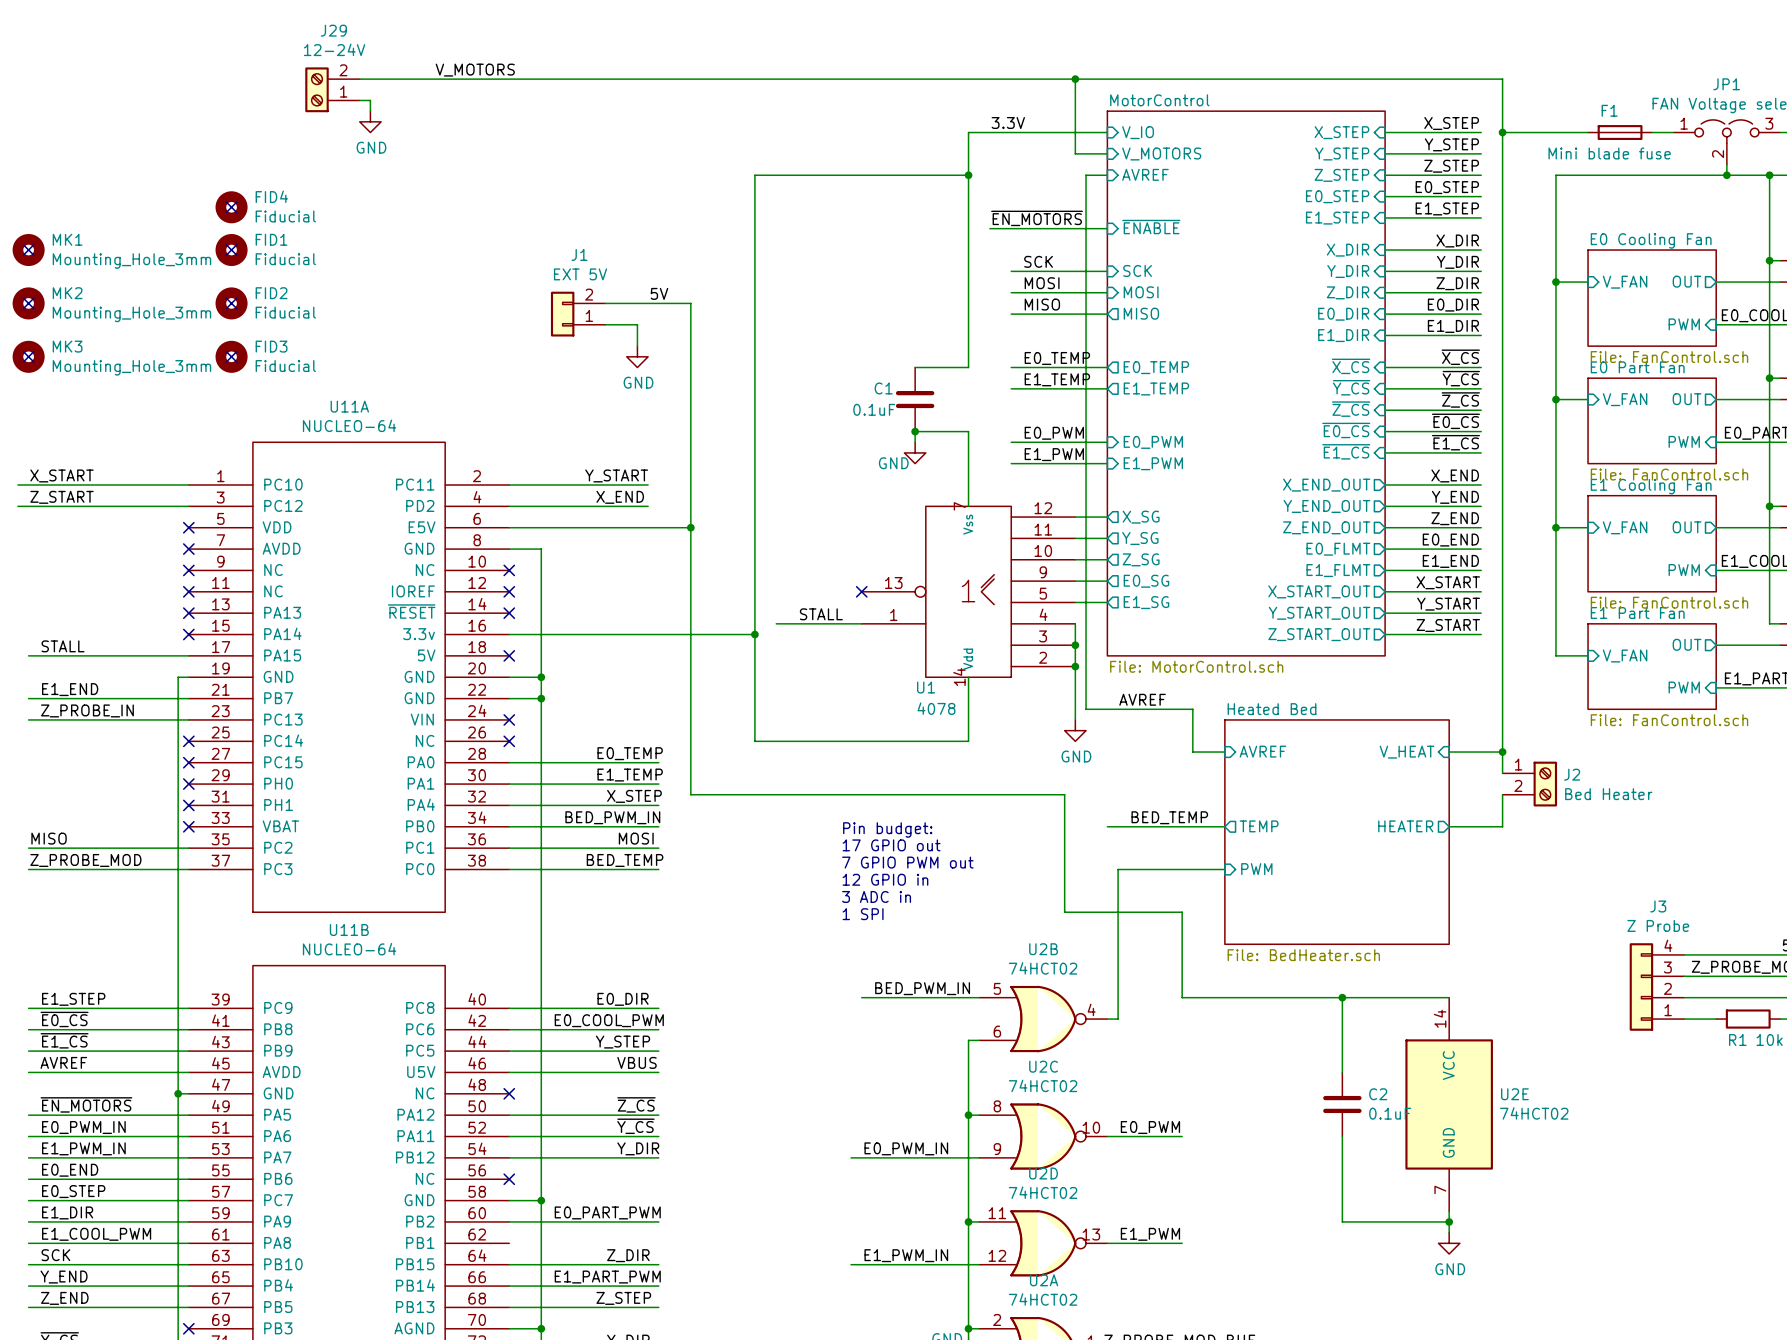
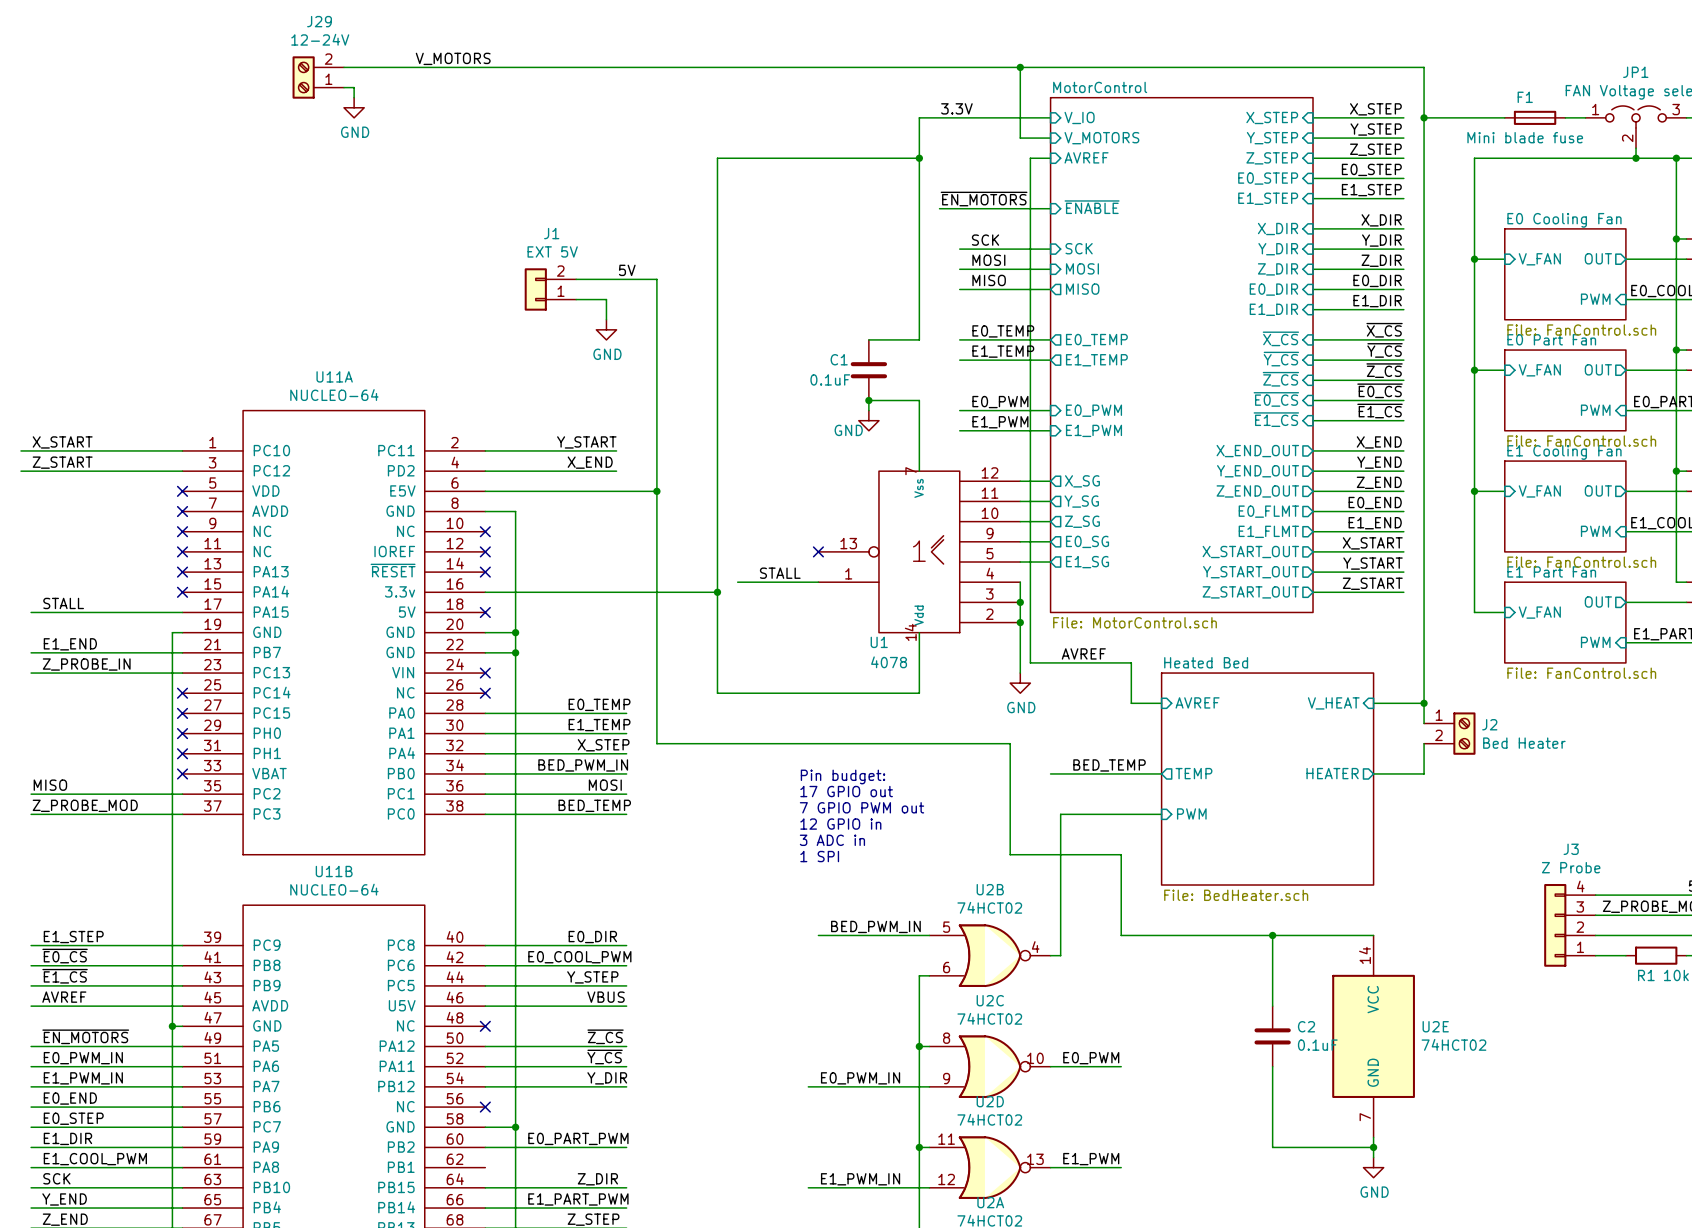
FID4: Fiducial (231, 207) -> none
no-connect mark: (231, 207) -> none
MK1: Mounting_Hole_3mm (28, 250) -> none
no-connect mark: (28, 250) -> none
FID1: Fiducial (231, 250) -> none
no-connect mark: (231, 250) -> none
MK2: Mounting_Hole_3mm (28, 303) -> none
no-connect mark: (28, 303) -> none
FID2: Fiducial (231, 303) -> none
no-connect mark: (231, 303) -> none
MK3: Mounting_Hole_3mm (28, 356) -> none
no-connect mark: (28, 356) -> none
FID3: Fiducial (231, 356) -> none
no-connect mark: (231, 356) -> none

